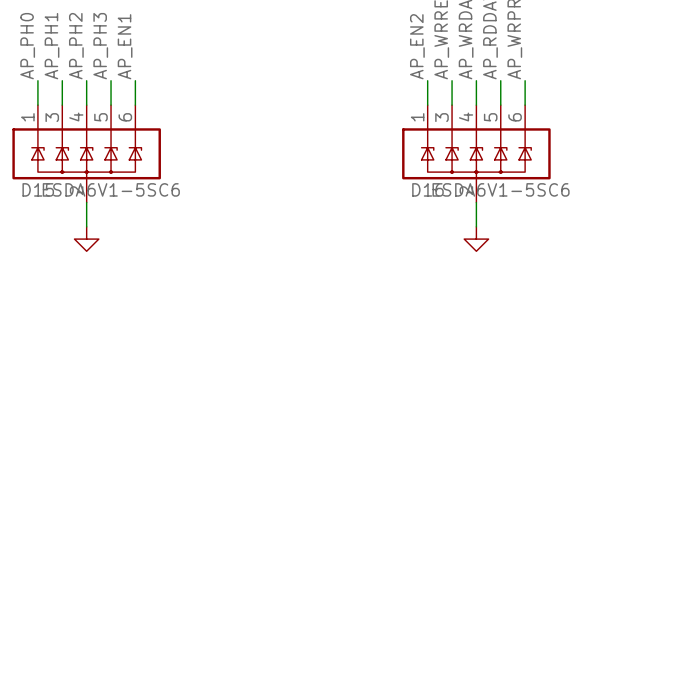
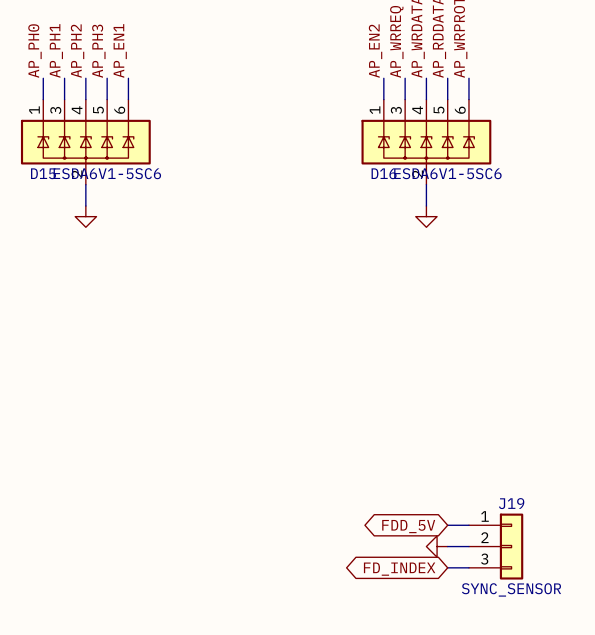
global label: none -> FDD_5V (408, 526)
wire: none -> (447, 525) (468, 525)
power symbol: none -> (437, 546)
wire: none -> (447, 546) (468, 546)
J19: none -> SYNC_SENSOR (496, 546)
wire: none -> (447, 567) (468, 567)
global label: none -> FD_INDEX (399, 569)

